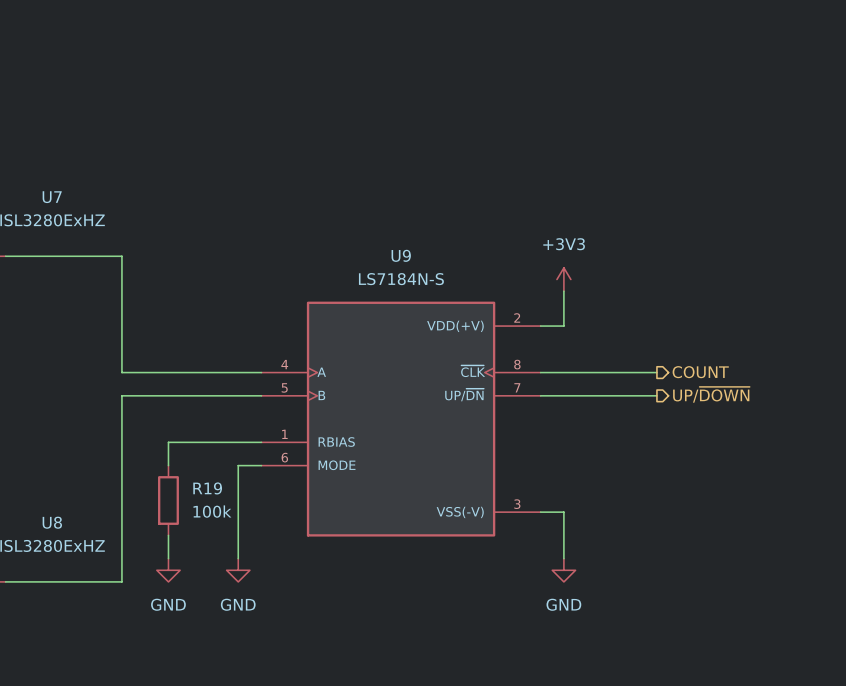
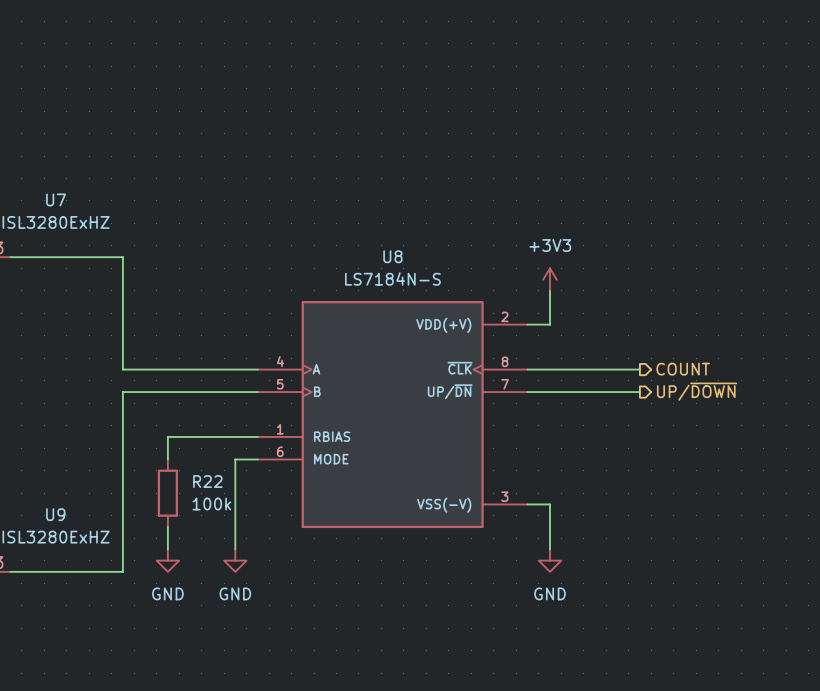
U9 name: U9 (401, 255) -> U8 (392, 256)
R19 name: R19 (207, 488) -> R22 (207, 481)
U8 name: U8 (52, 522) -> U9 (55, 514)

